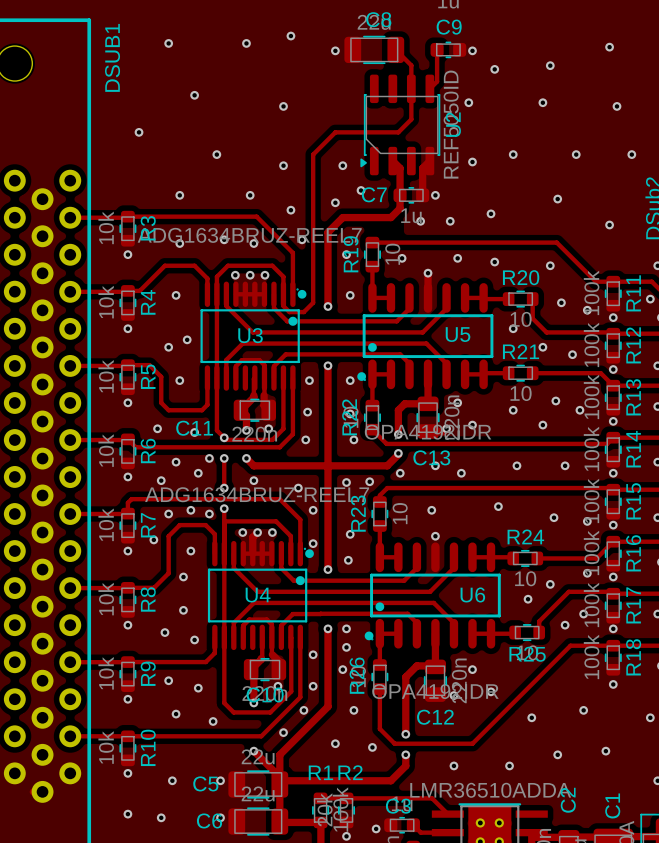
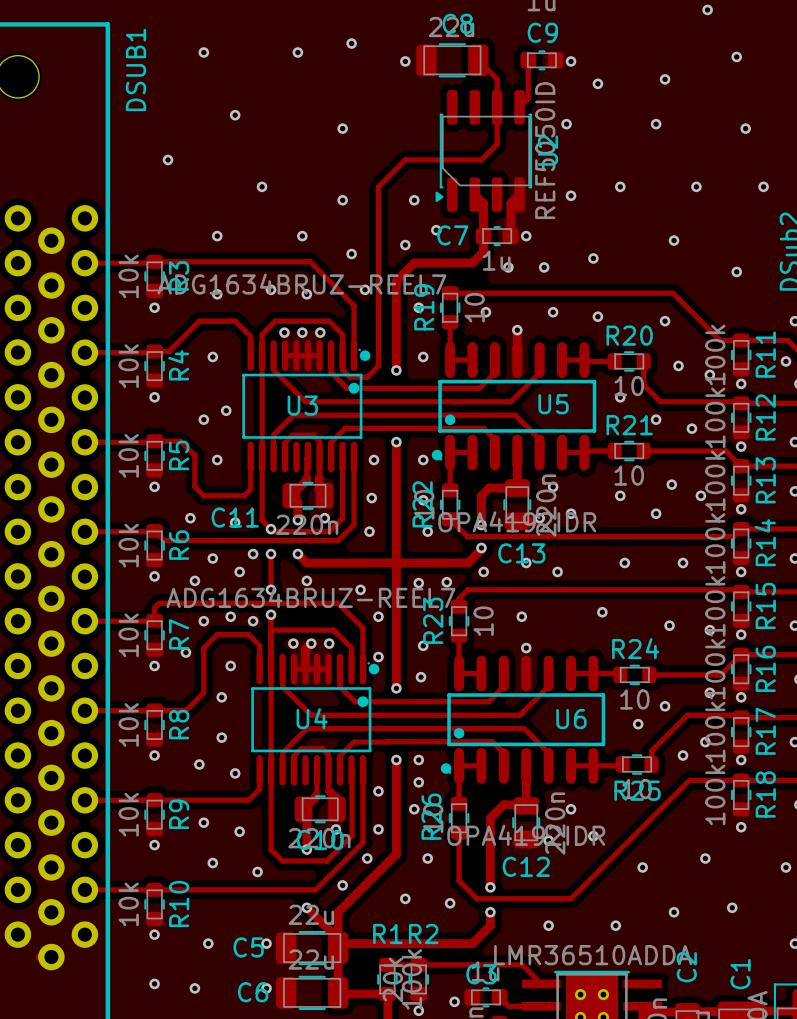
via: none -> (707, 9)

